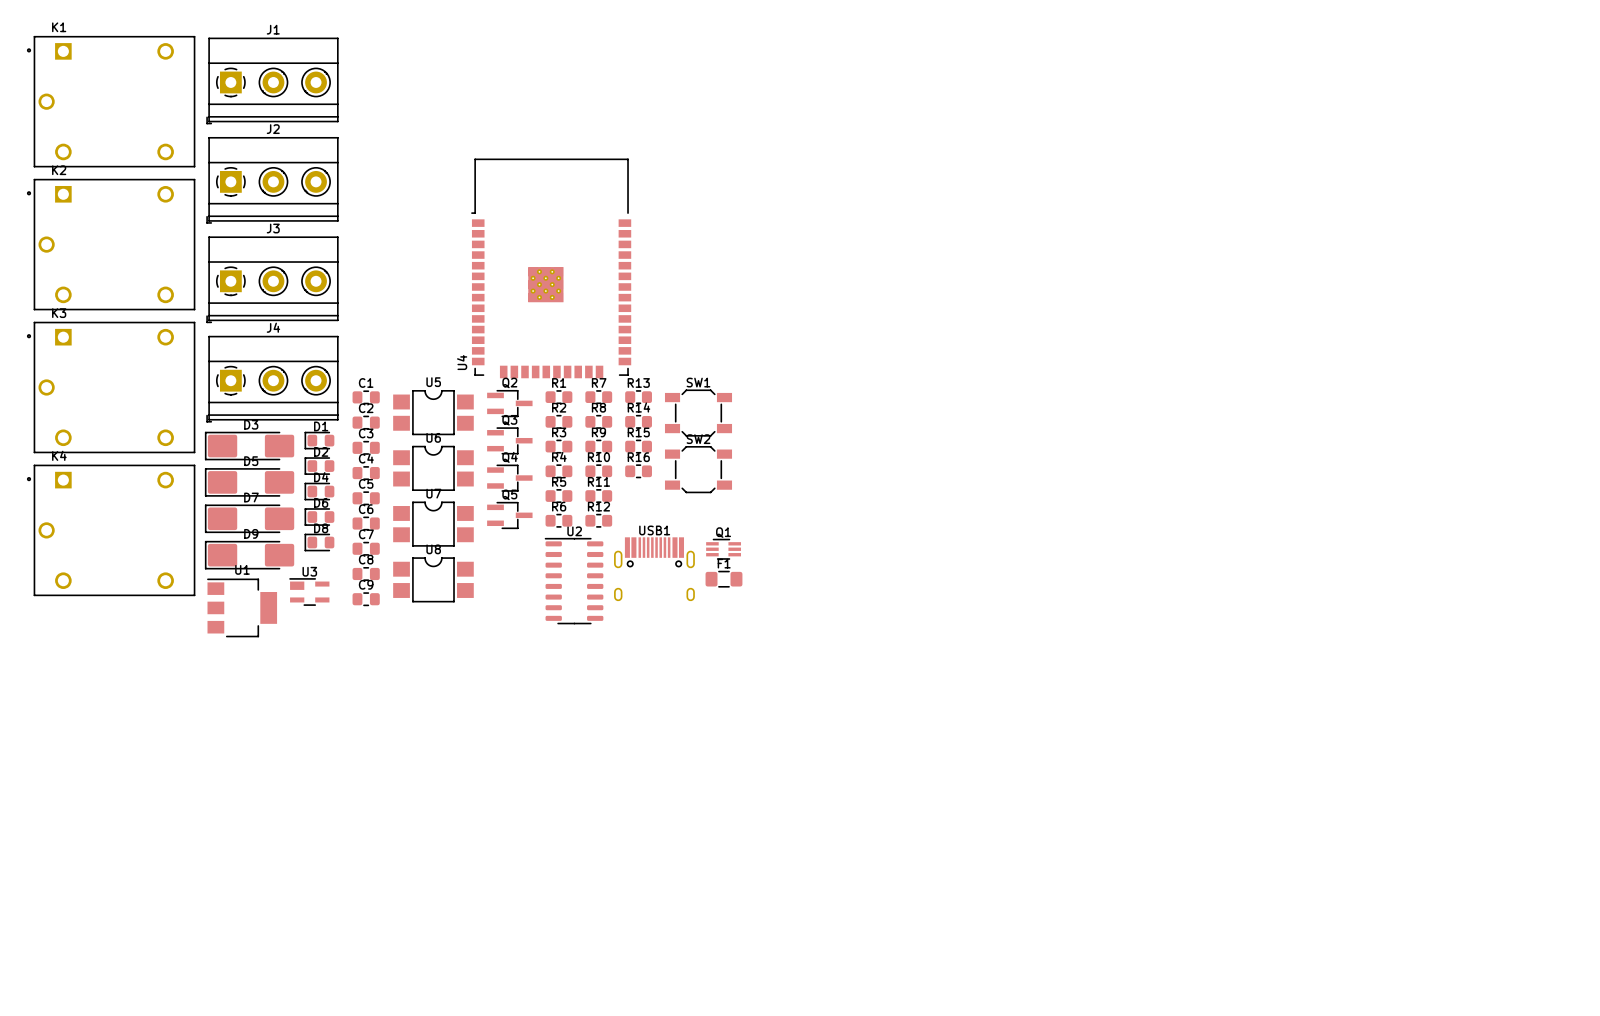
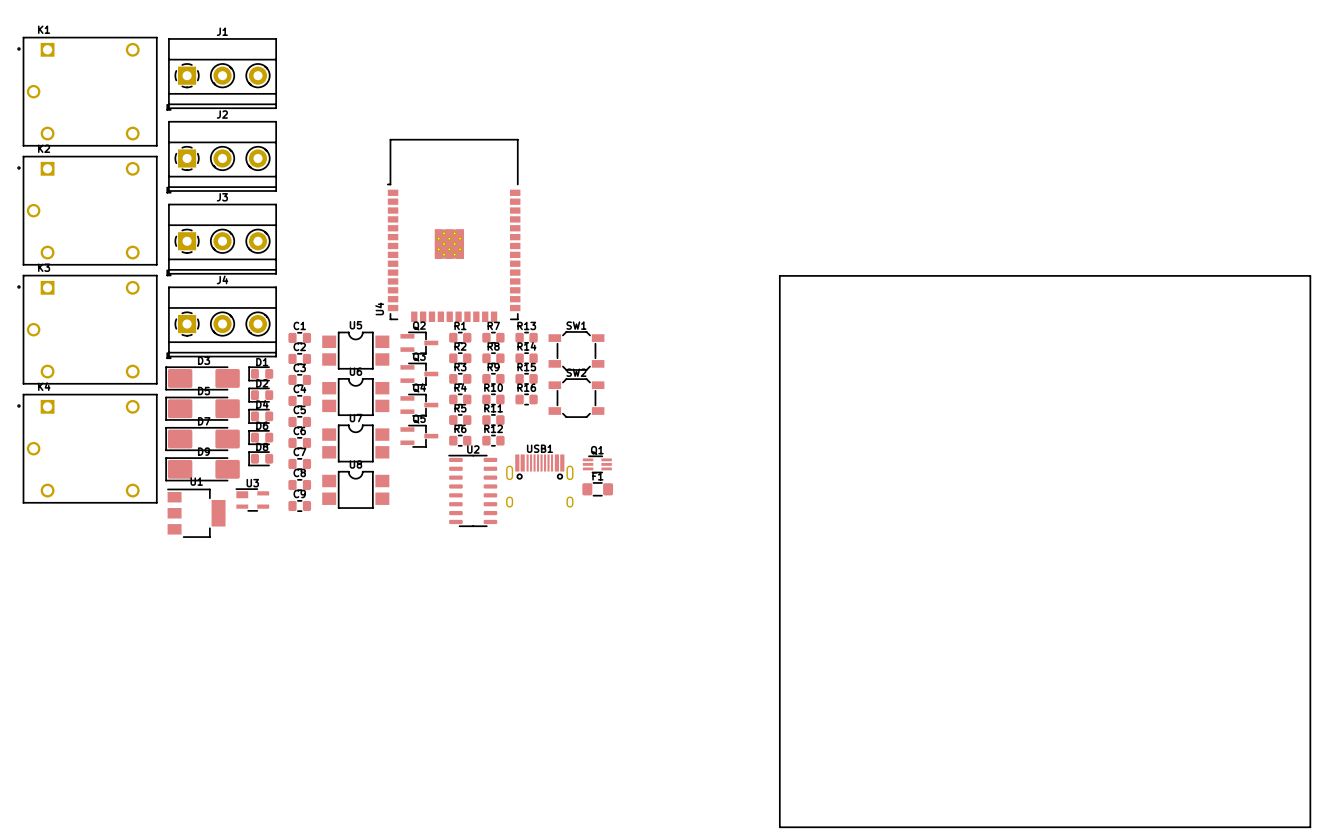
board edge: none -> (779, 275) (1310, 275) (1310, 827) (779, 827) (779, 275)

